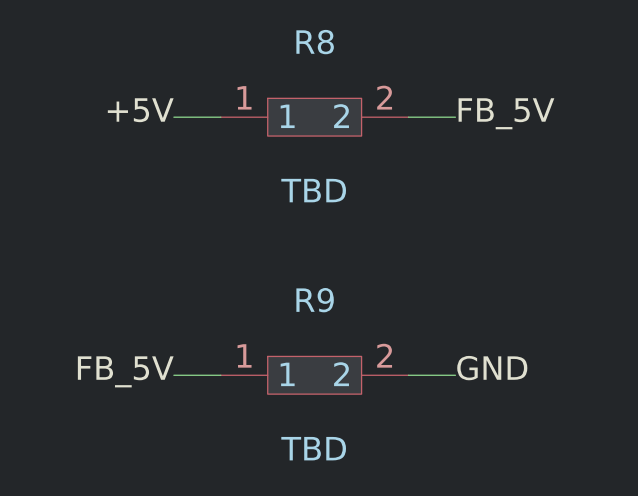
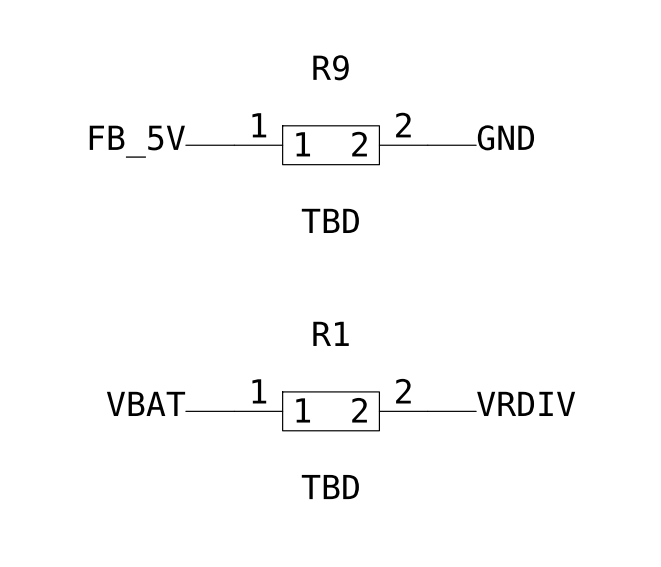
R8 name: R8 (315, 42) -> R9 (331, 67)
label: +5V (140, 110) -> FB_5V (137, 141)
label: FB_5V (506, 113) -> GND (505, 137)
R9 name: R9 (315, 300) -> R1 (331, 333)
label: GND (492, 368) -> VRDIV (526, 403)
label: FB_5V (125, 371) -> VBAT (146, 403)

